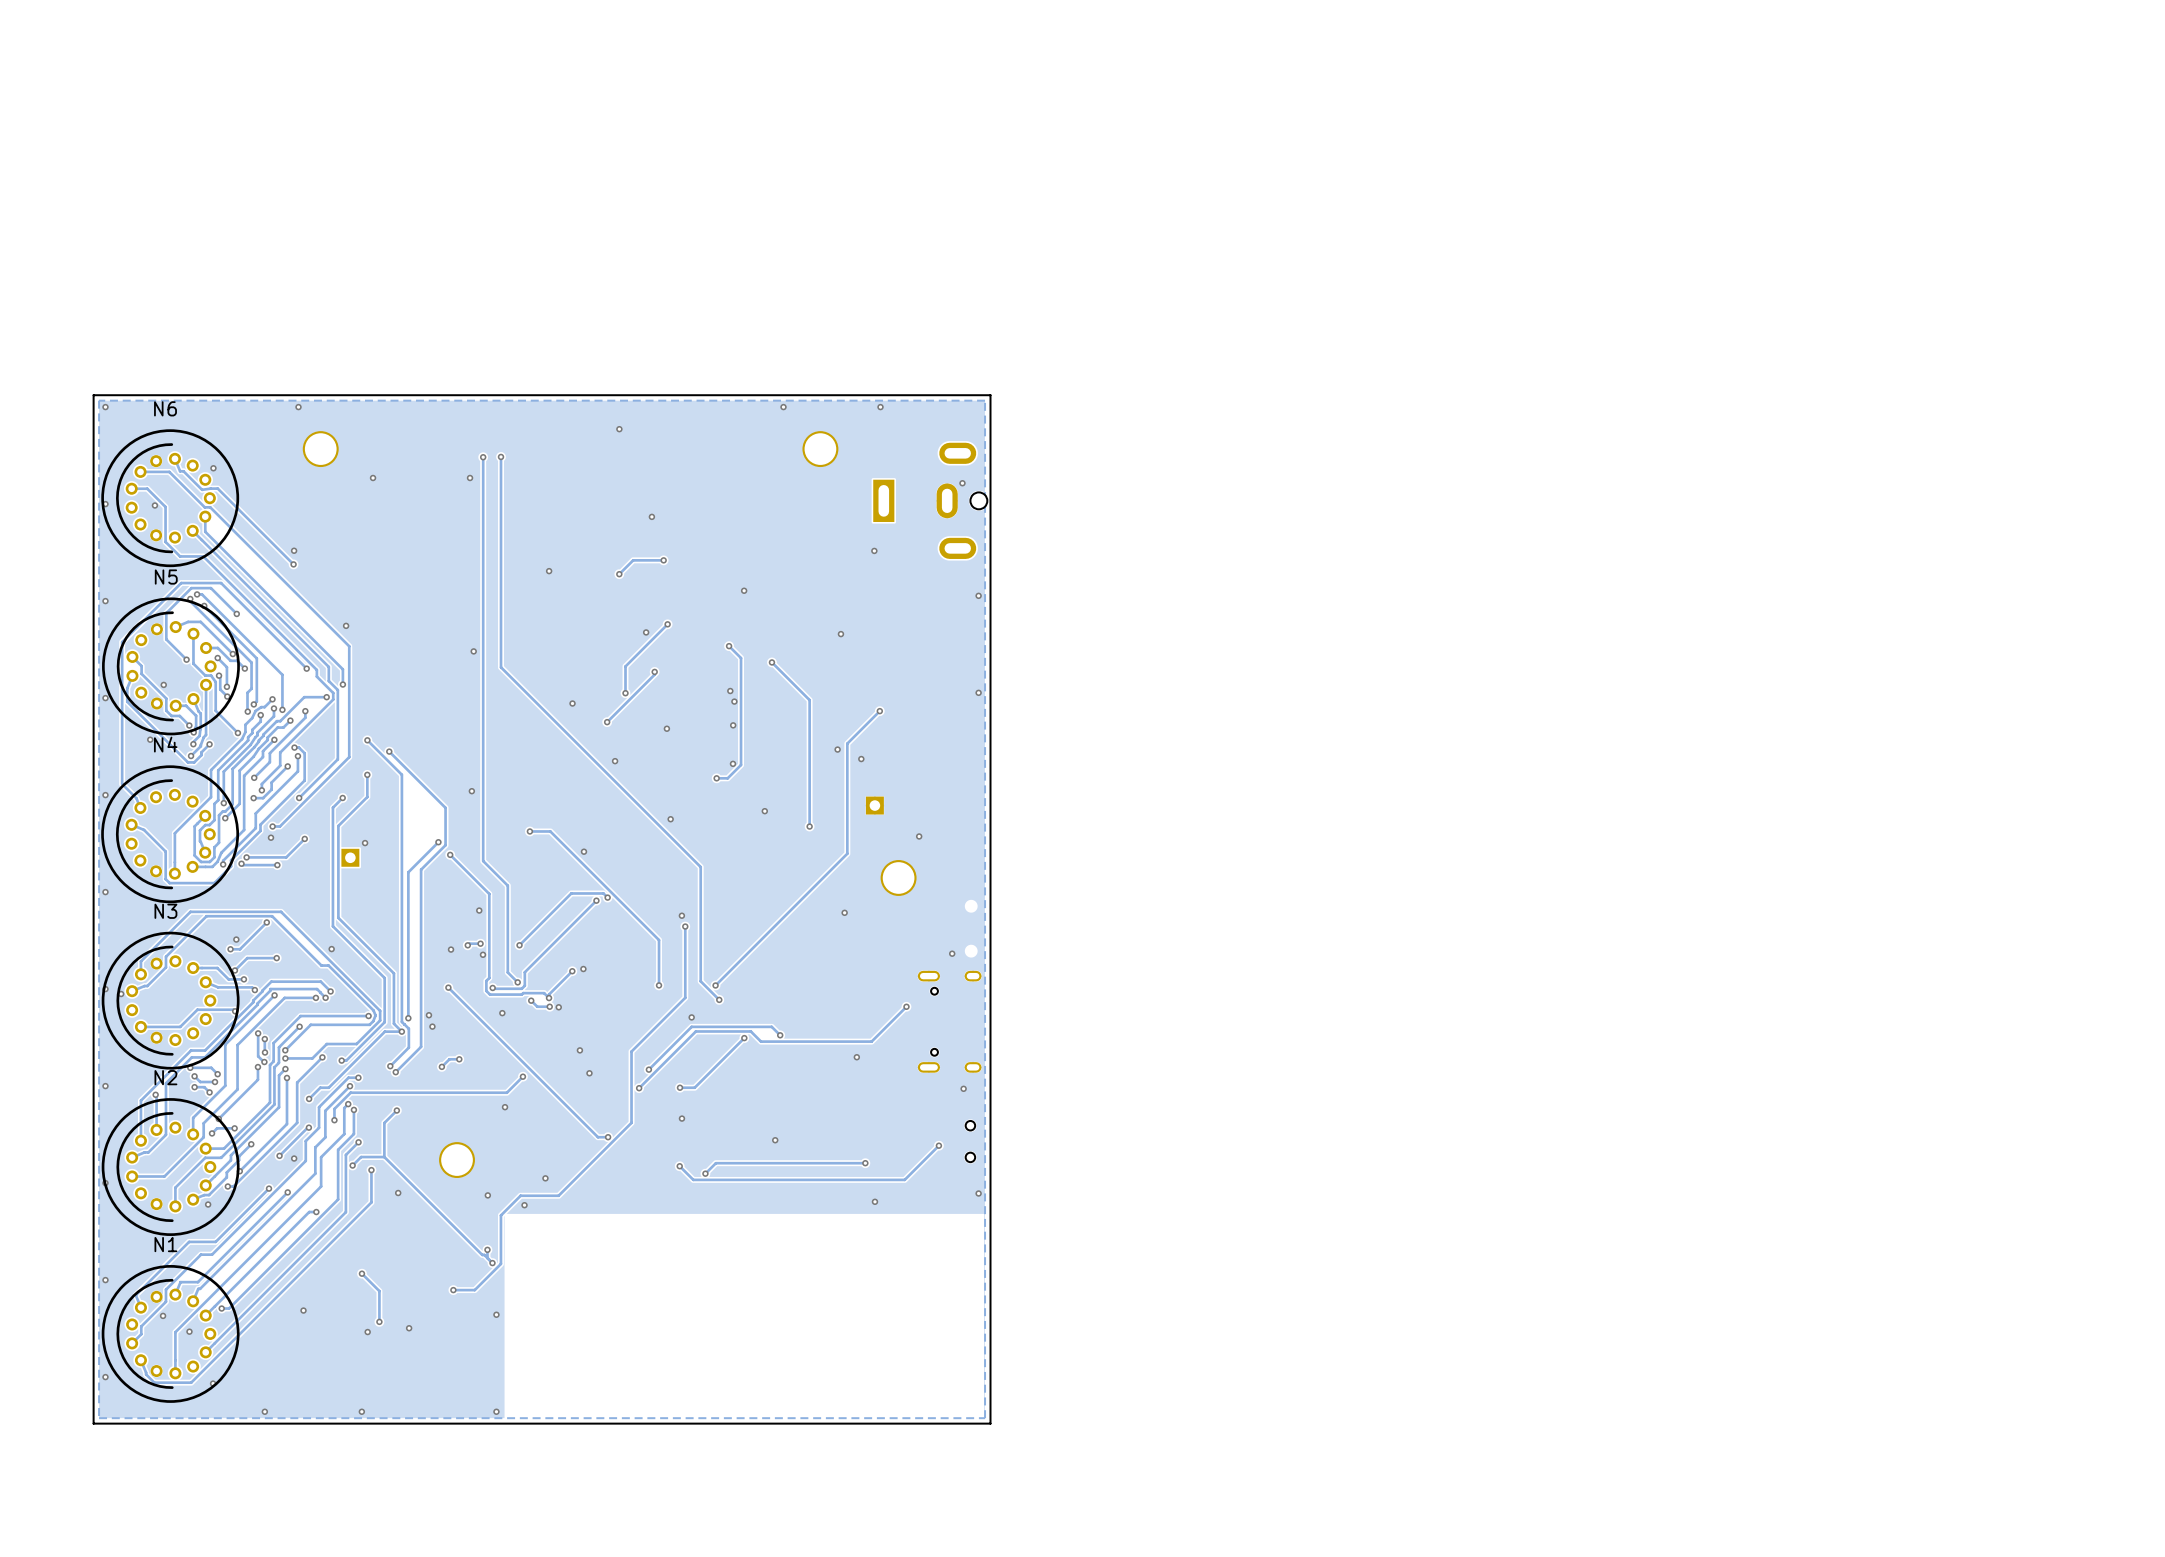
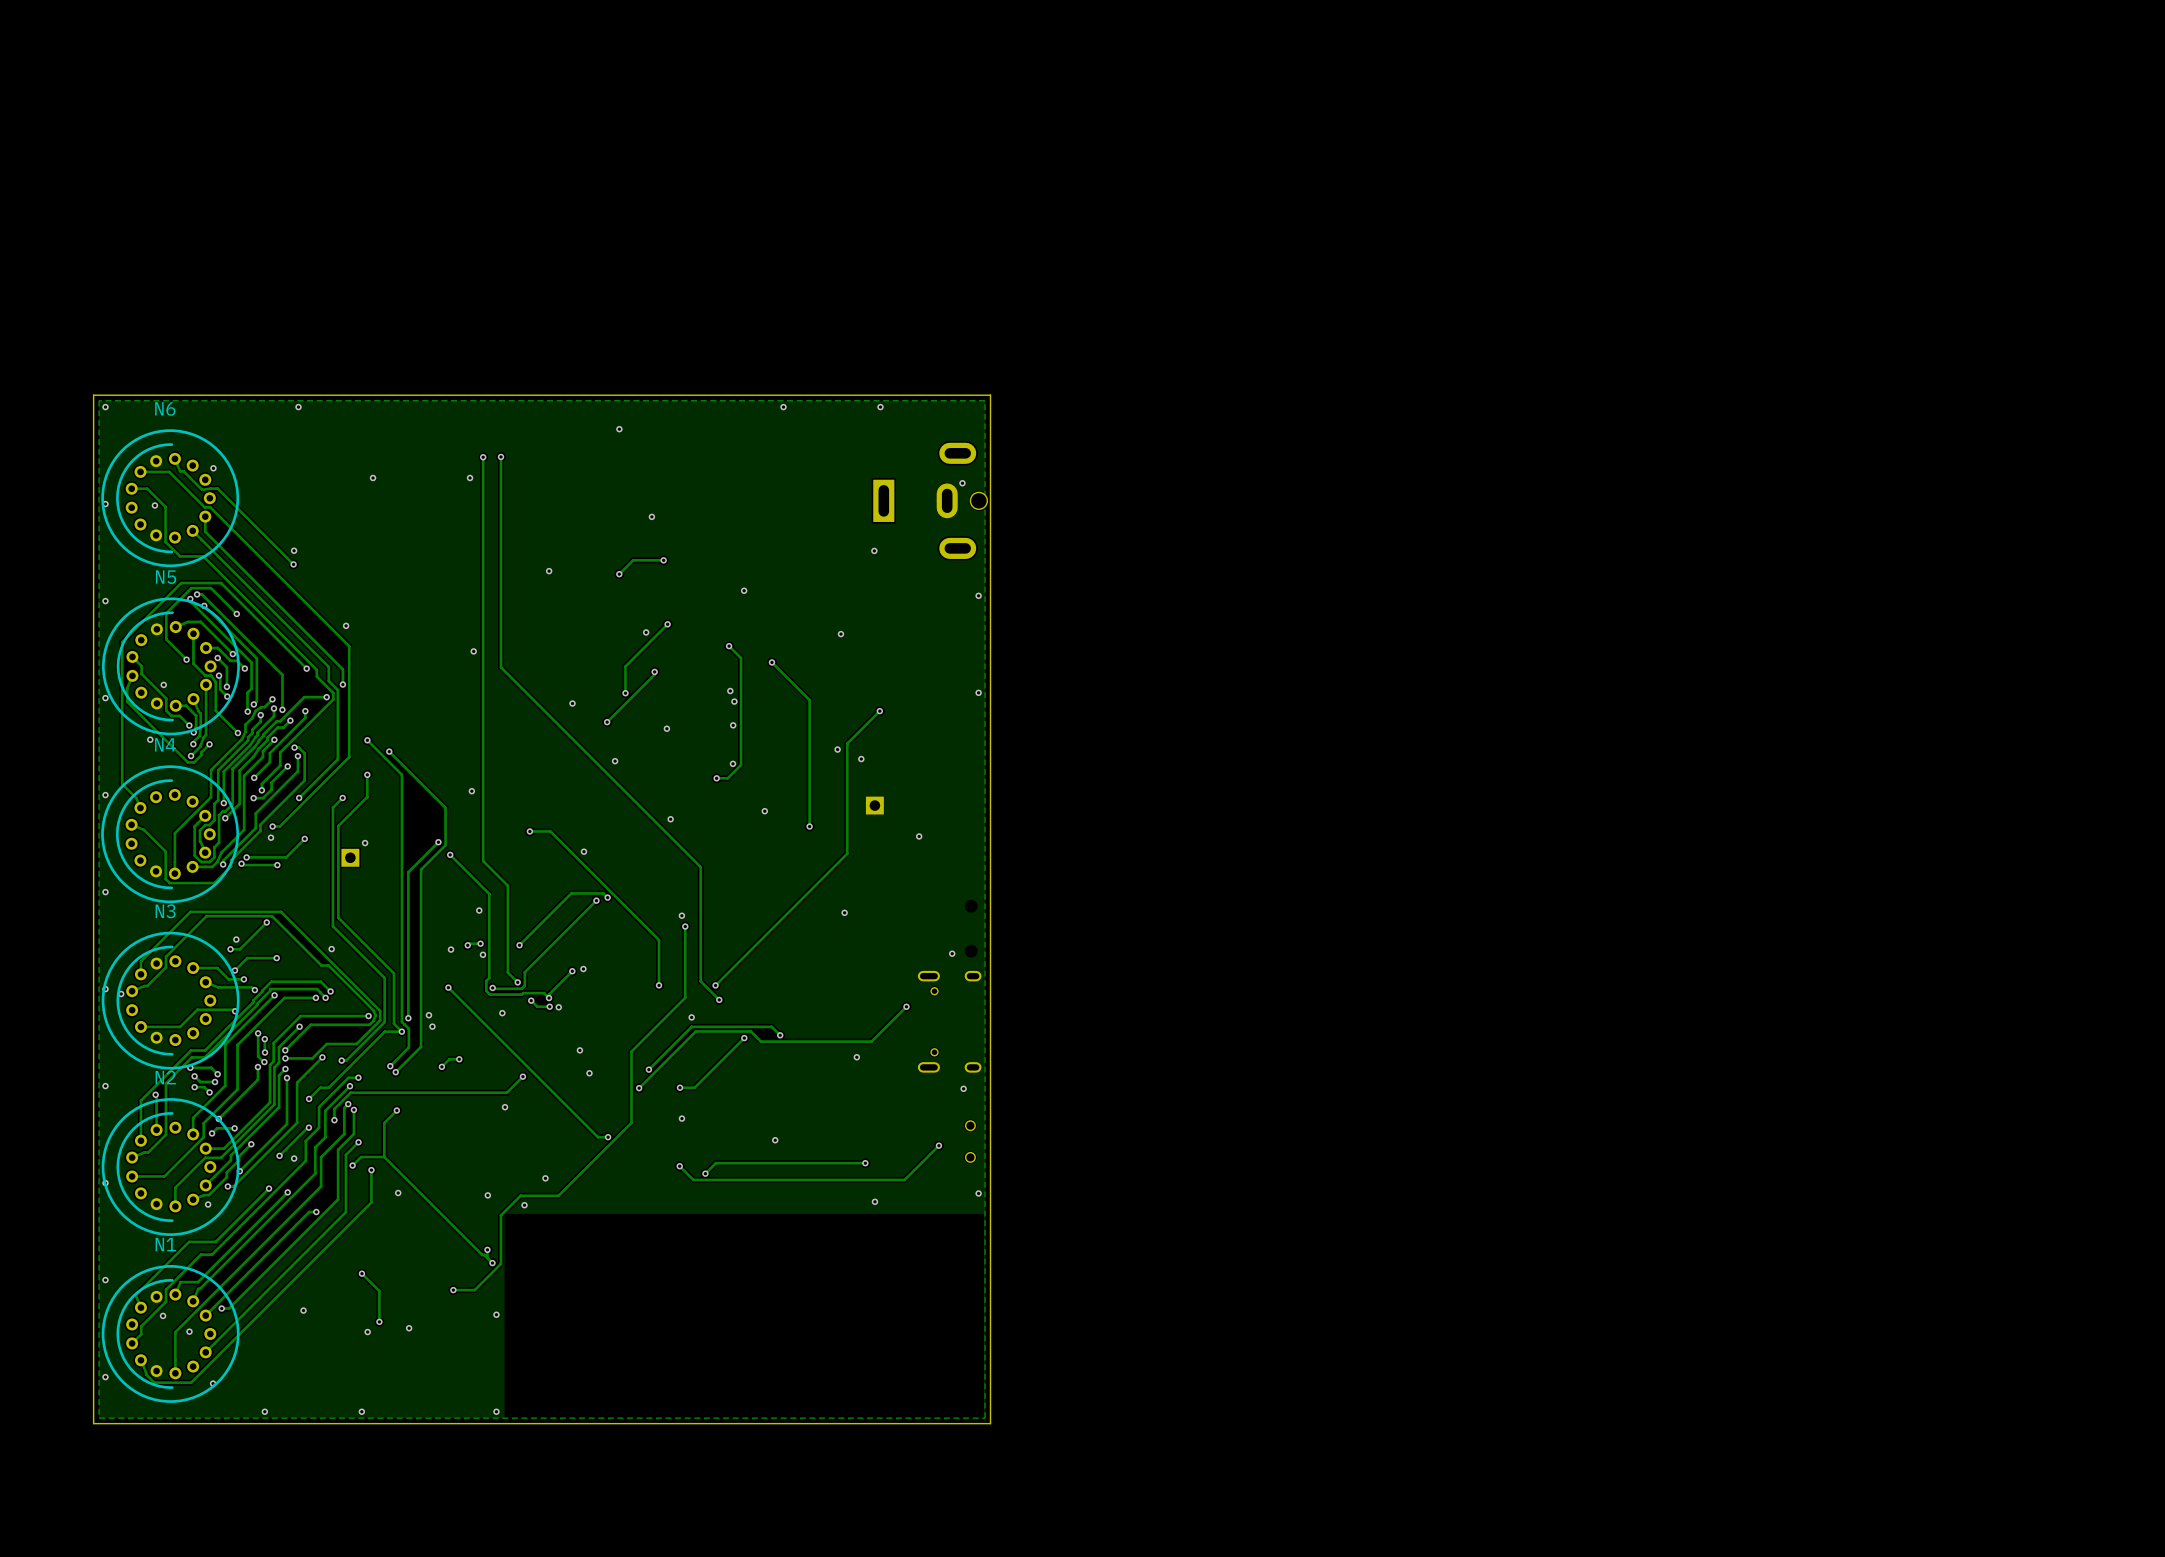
part: (320, 449) -> none
part: (820, 449) -> none
part: (898, 877) -> none
part: (457, 1160) -> none

